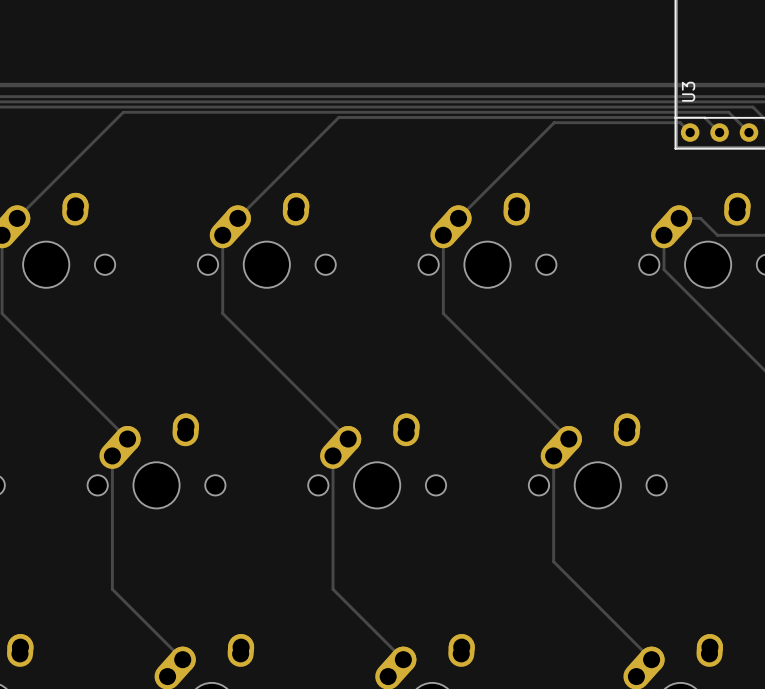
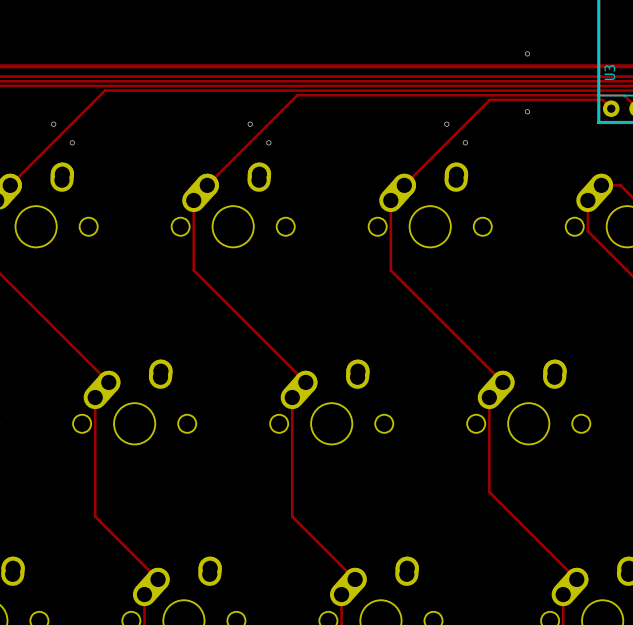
via: none -> (527, 53)
via: none -> (527, 111)
via: none -> (53, 124)
via: none -> (250, 124)
via: none -> (446, 124)
via: none -> (72, 142)
via: none -> (268, 142)
via: none -> (465, 142)

